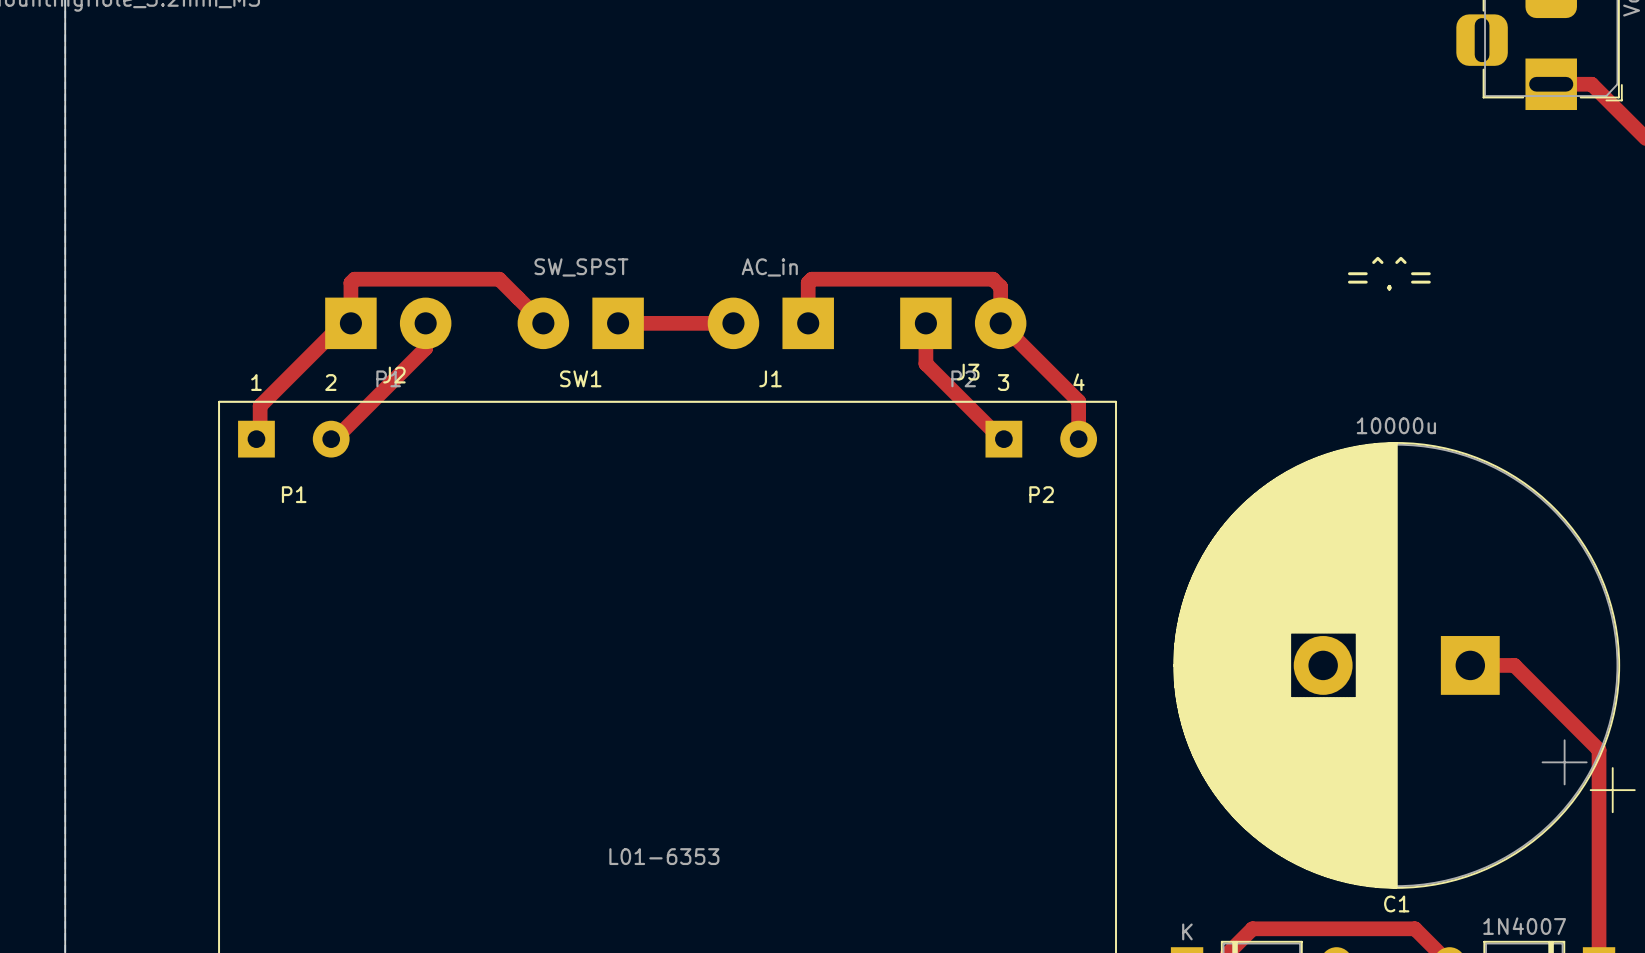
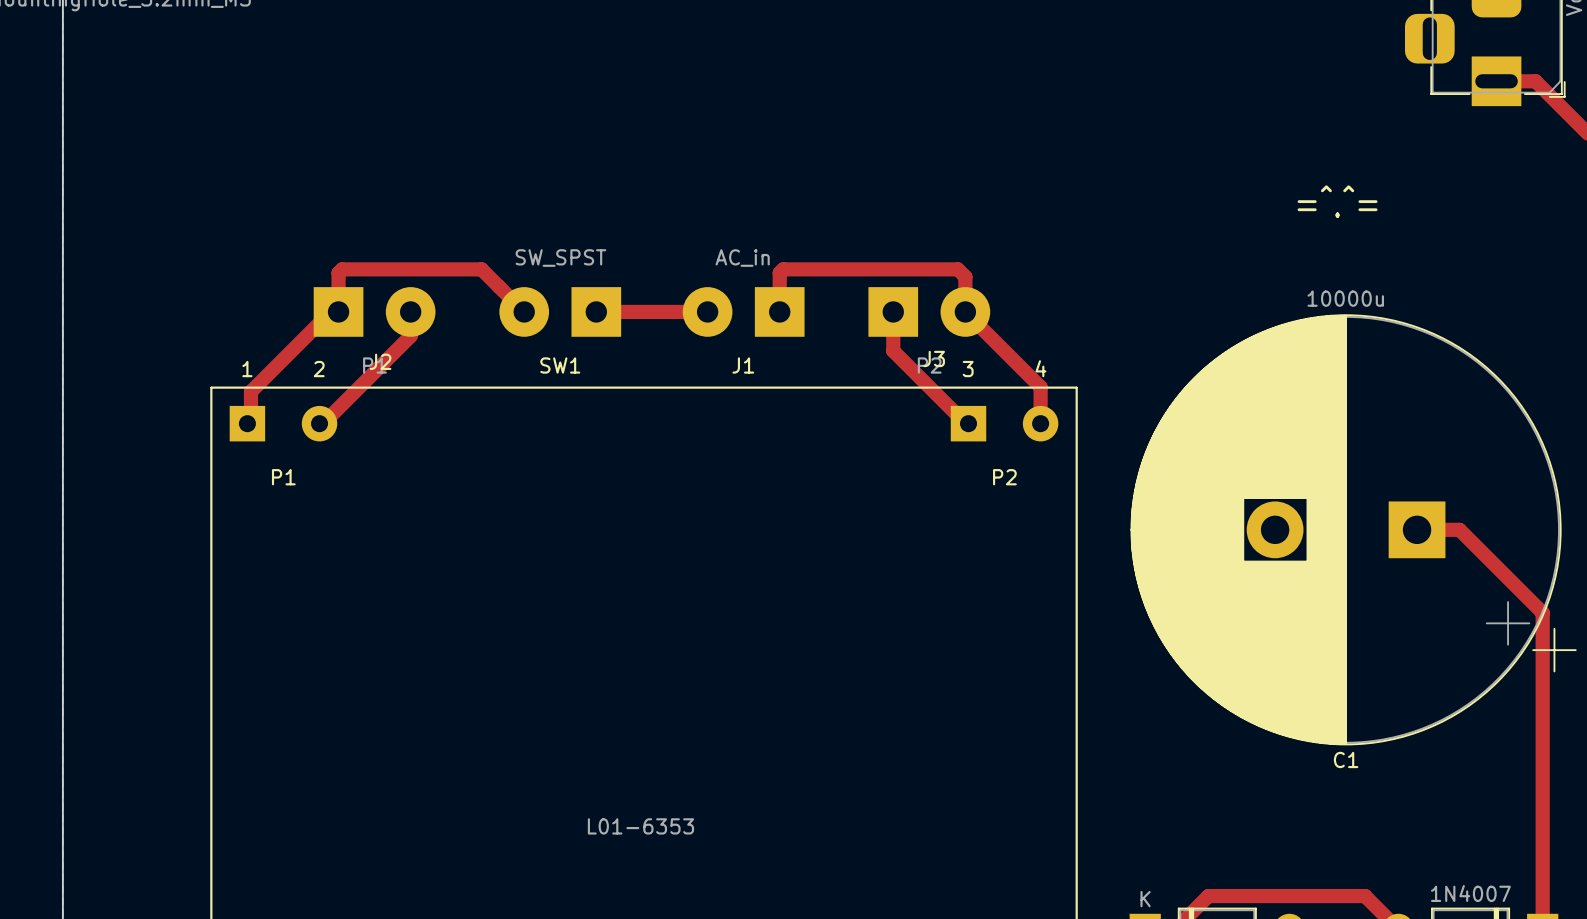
text position: =^.^= (1389, 273) -> =^.^= (1337, 201)
C1 position: (1404, 665) -> (1353, 529)
top track: (1470, 665) (1514, 665) (1599, 750) -> (1417, 529) (1459, 529) (1542, 612) (1542, 723)

